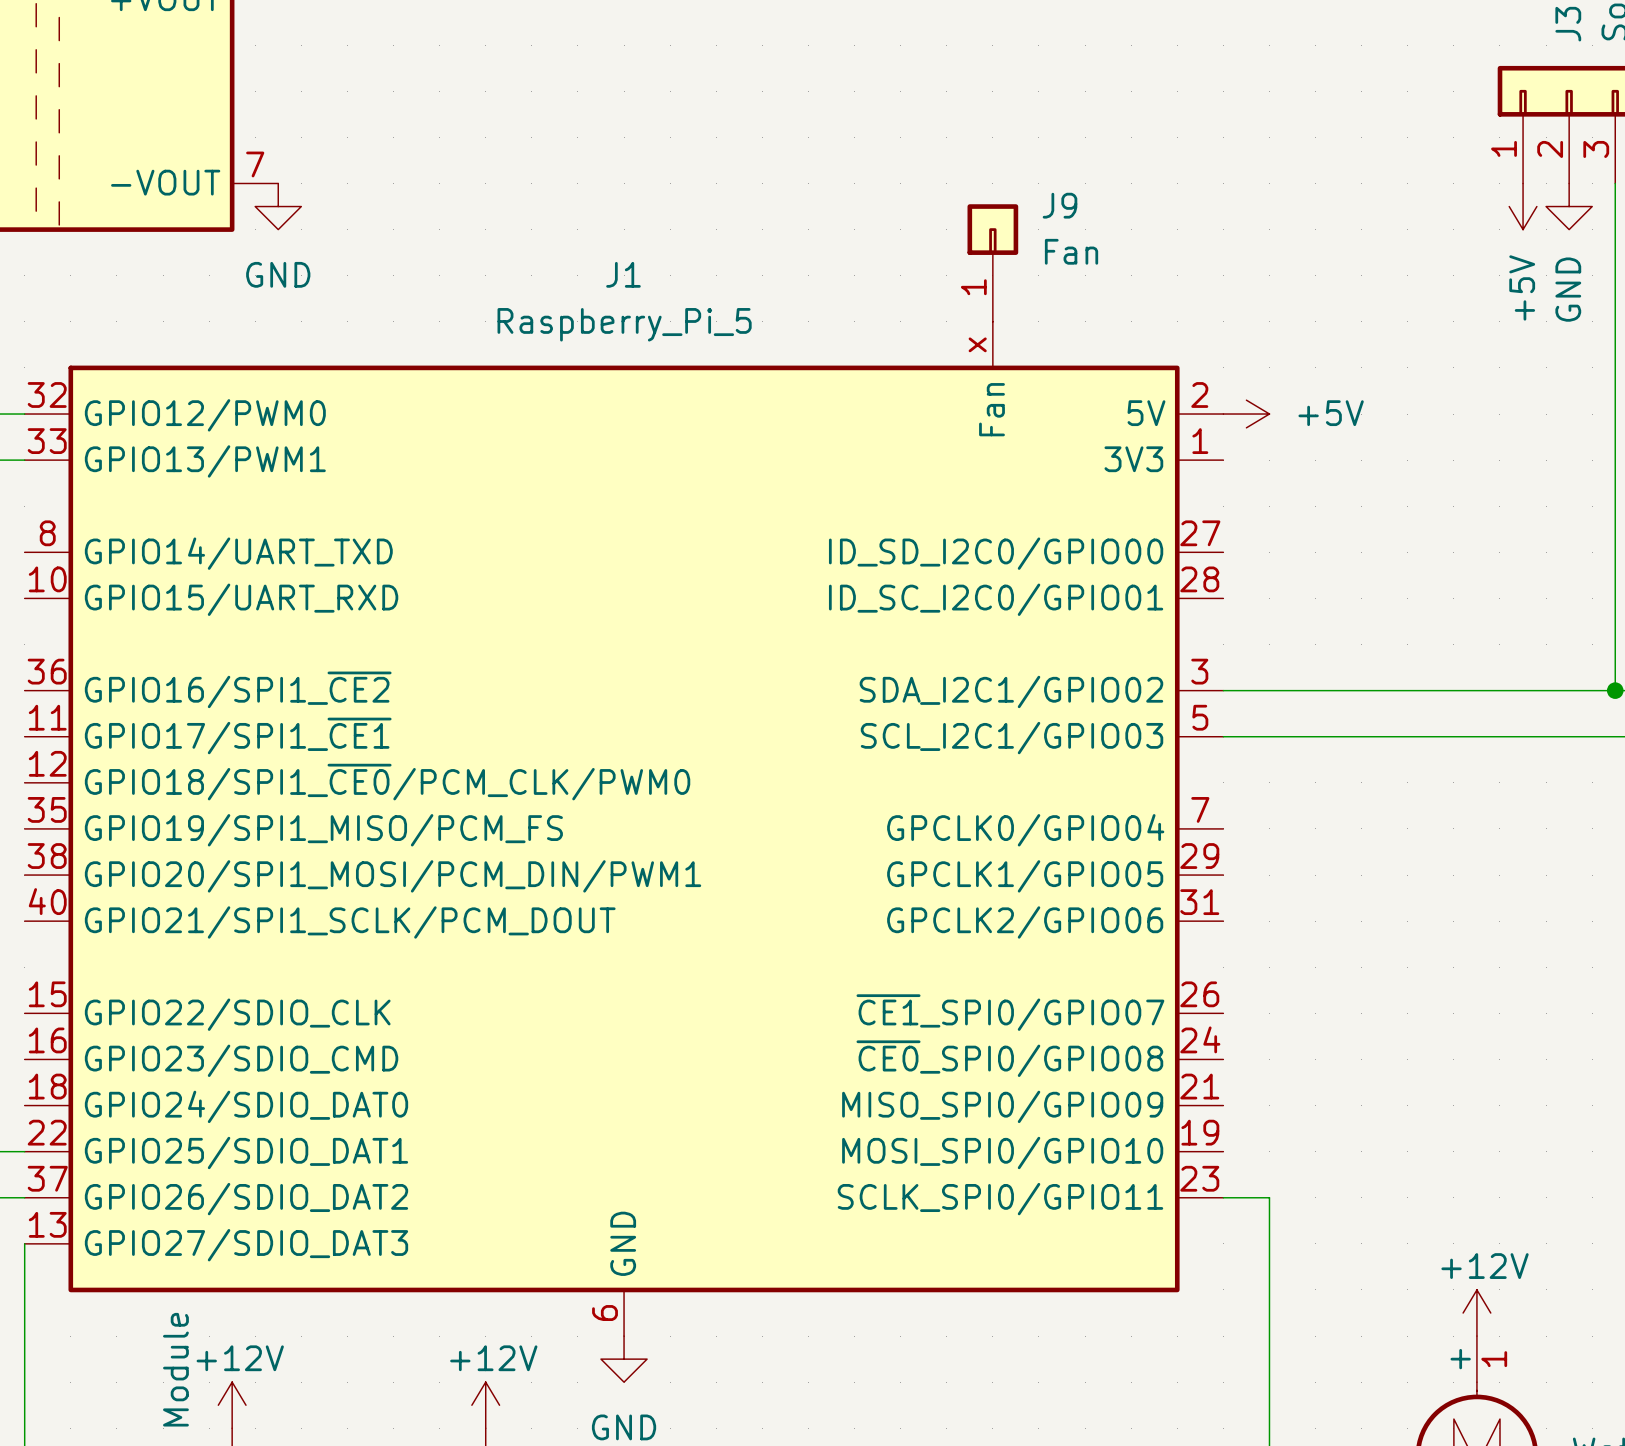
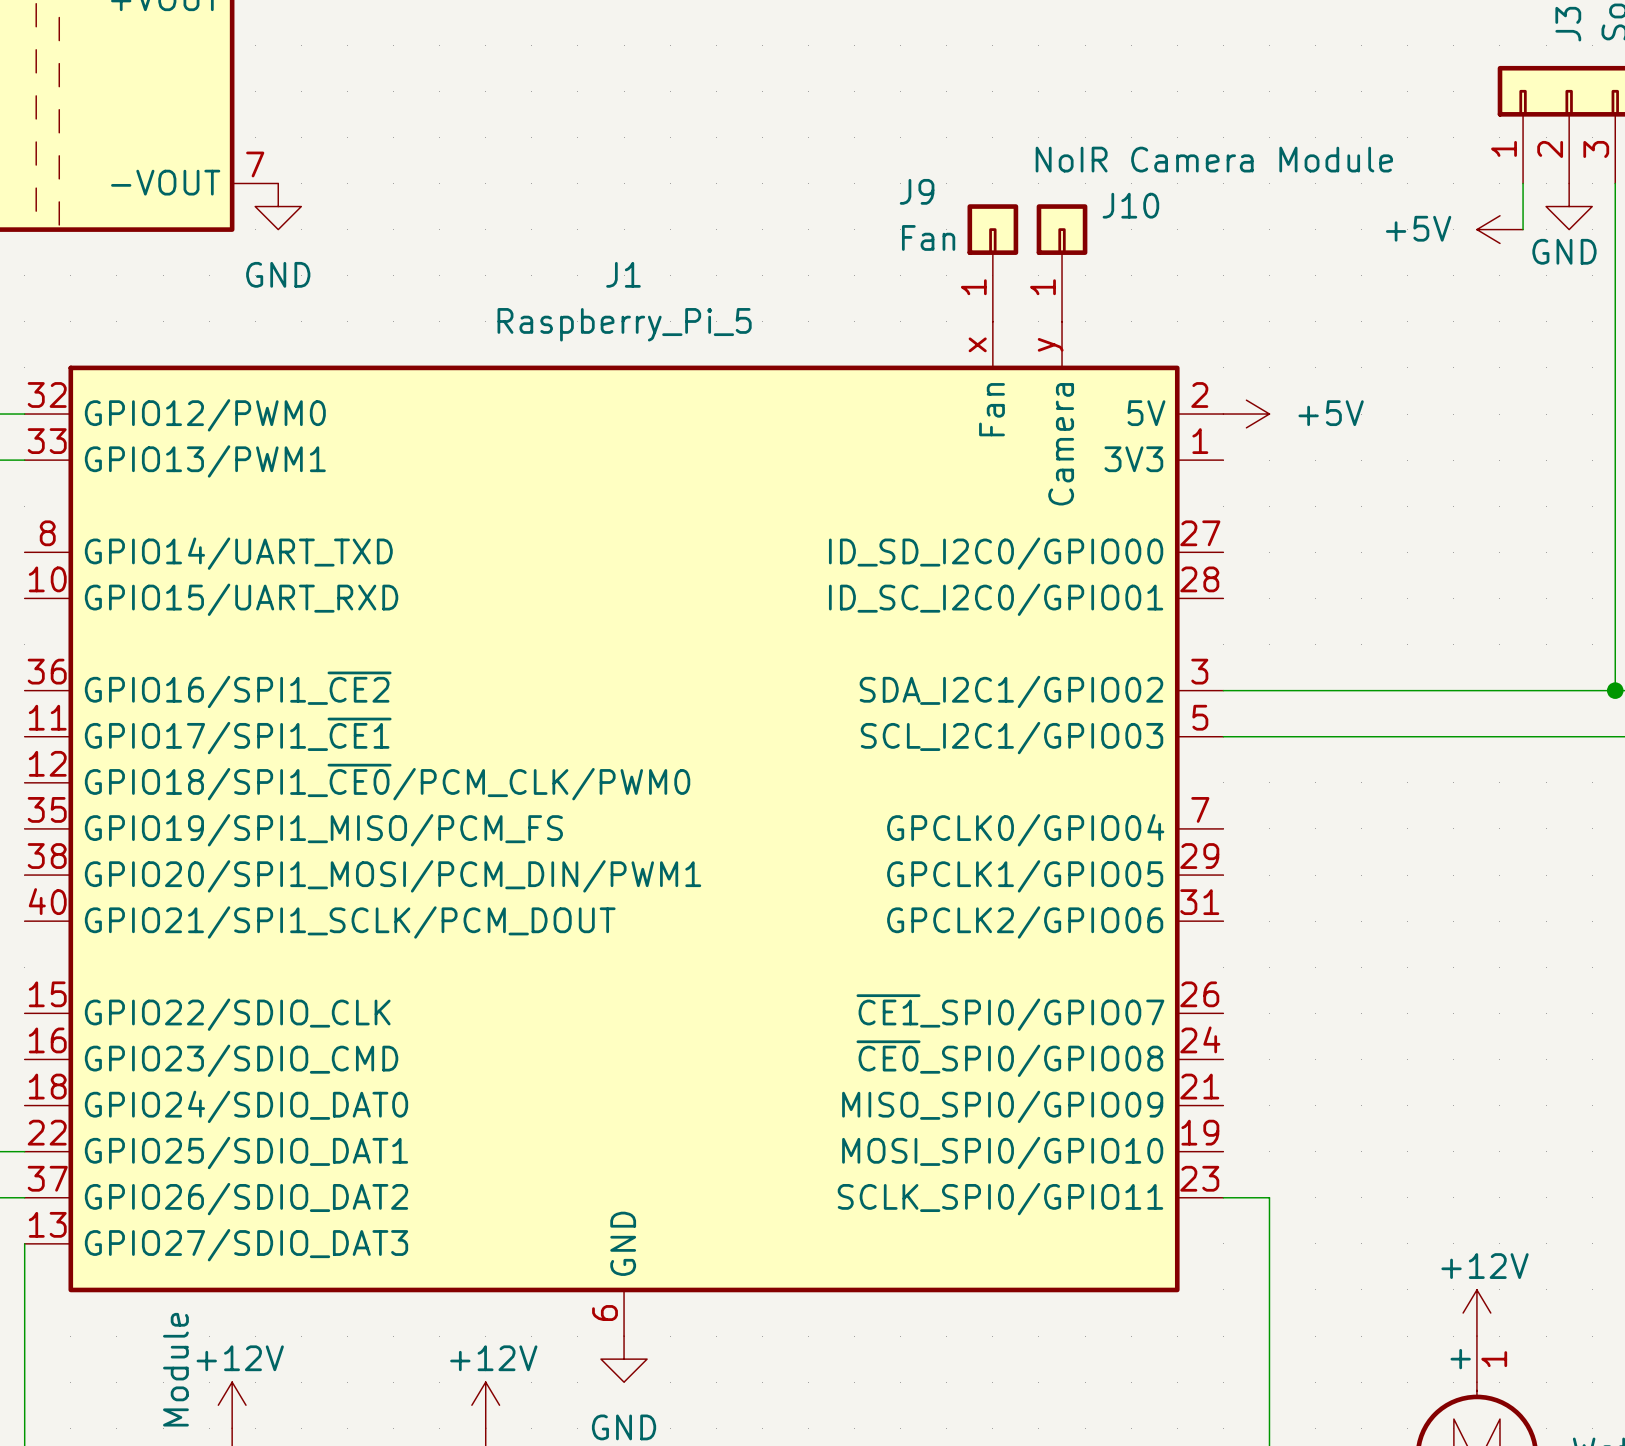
J9 name position: J9 (1059, 205) -> J9 (917, 191)
power symbol rotation: 0° (1523, 206) -> 90° clockwise (1499, 229)
power symbol position: +5V (1523, 206) -> +5V (1499, 229)
J9 value position: Fan (1071, 251) -> Fan (928, 237)
J10: none -> NoIR Camera Module (1062, 263)
power symbol text rotation: 0° (1568, 289) -> 90° clockwise (1564, 251)
J1 symbol: [24, 321, 1224, 1337] -> [24, 321, 1224, 1337]

